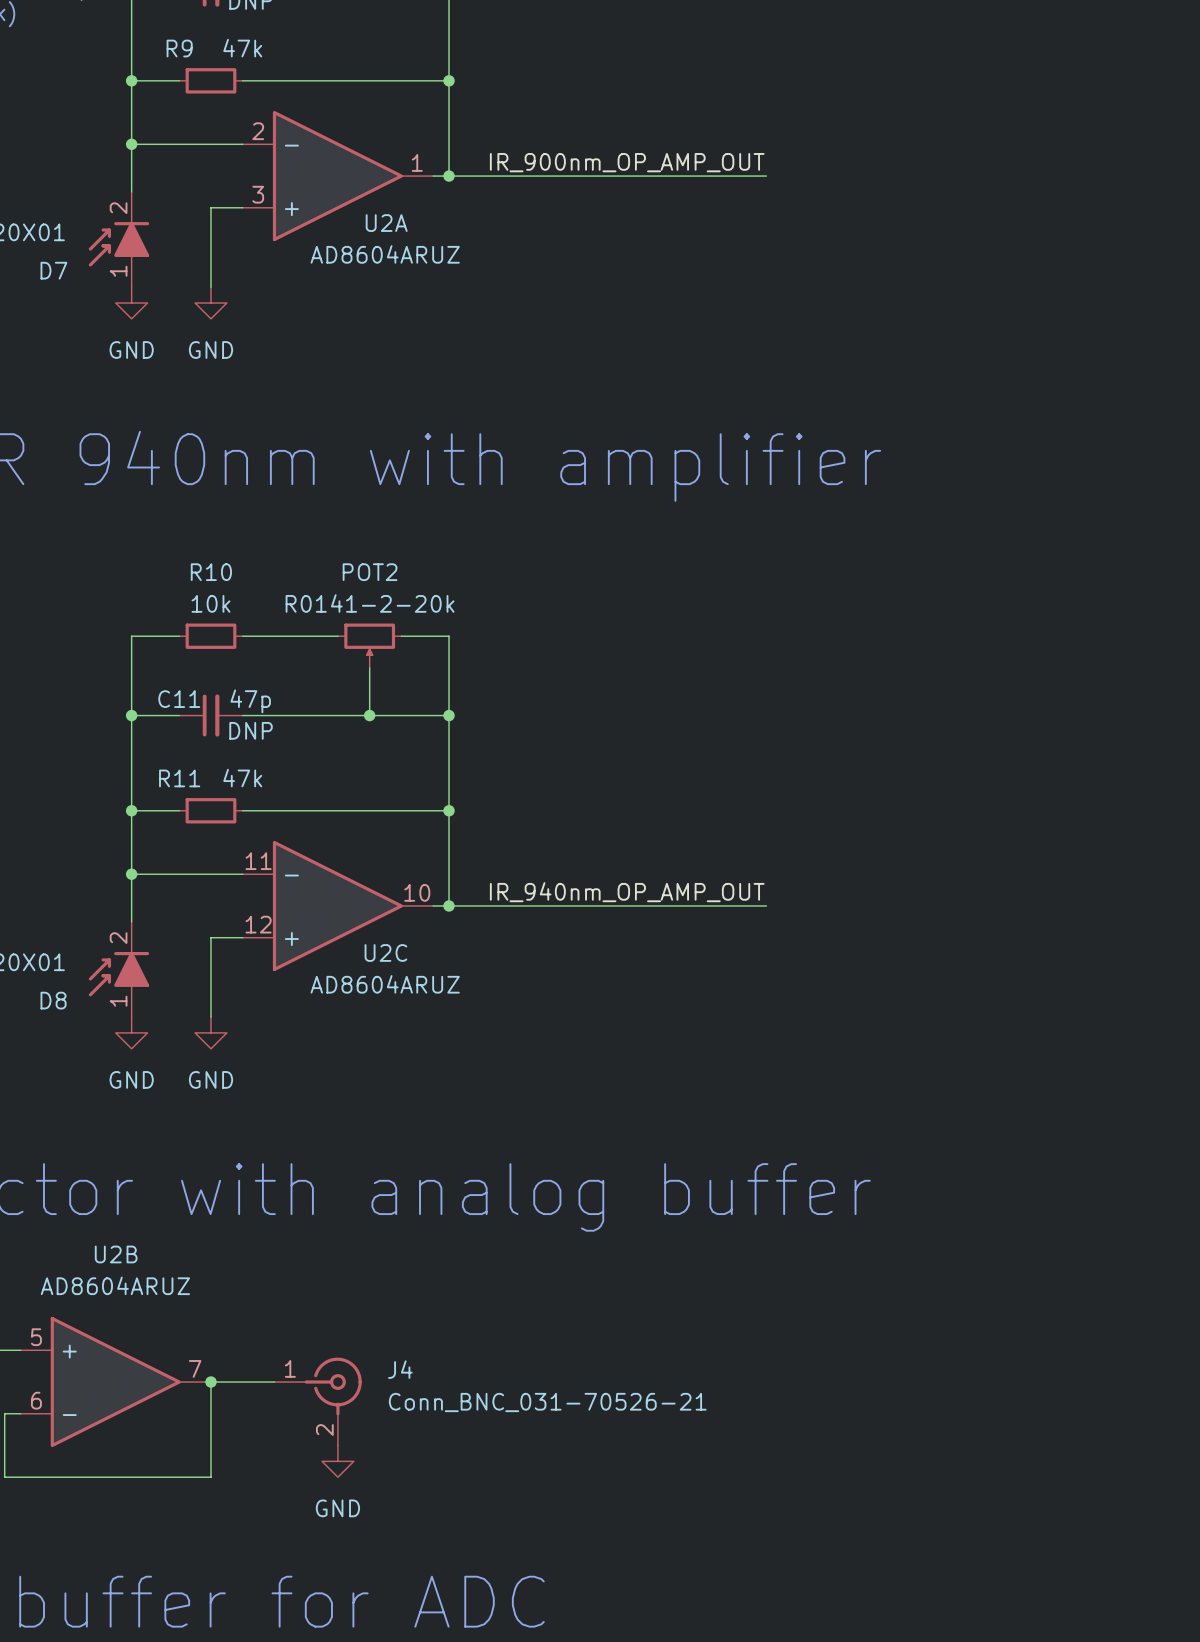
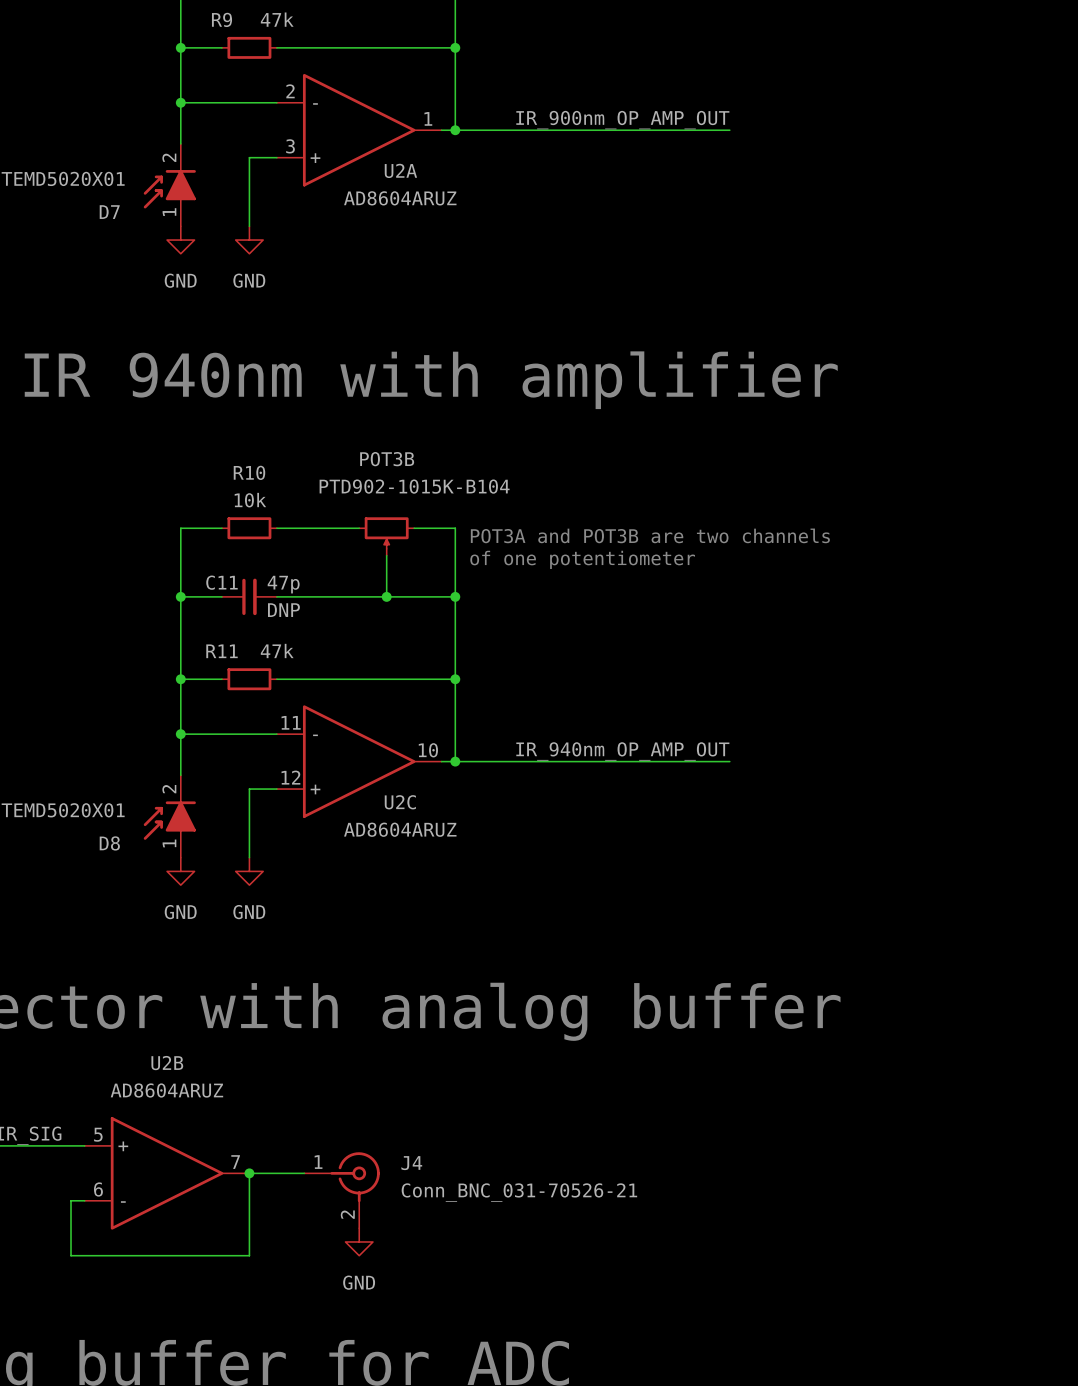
POT2 name: POT2 (370, 572) -> POT3B (387, 459)
POT2 value: none -> PTD902-1015K-B104 (414, 486)
POT2 text: R0141-2-20k (370, 603) -> none
text: none -> POT3A and POT3B are two channels (650, 535)
text: none -> of one potentiometer (582, 559)

